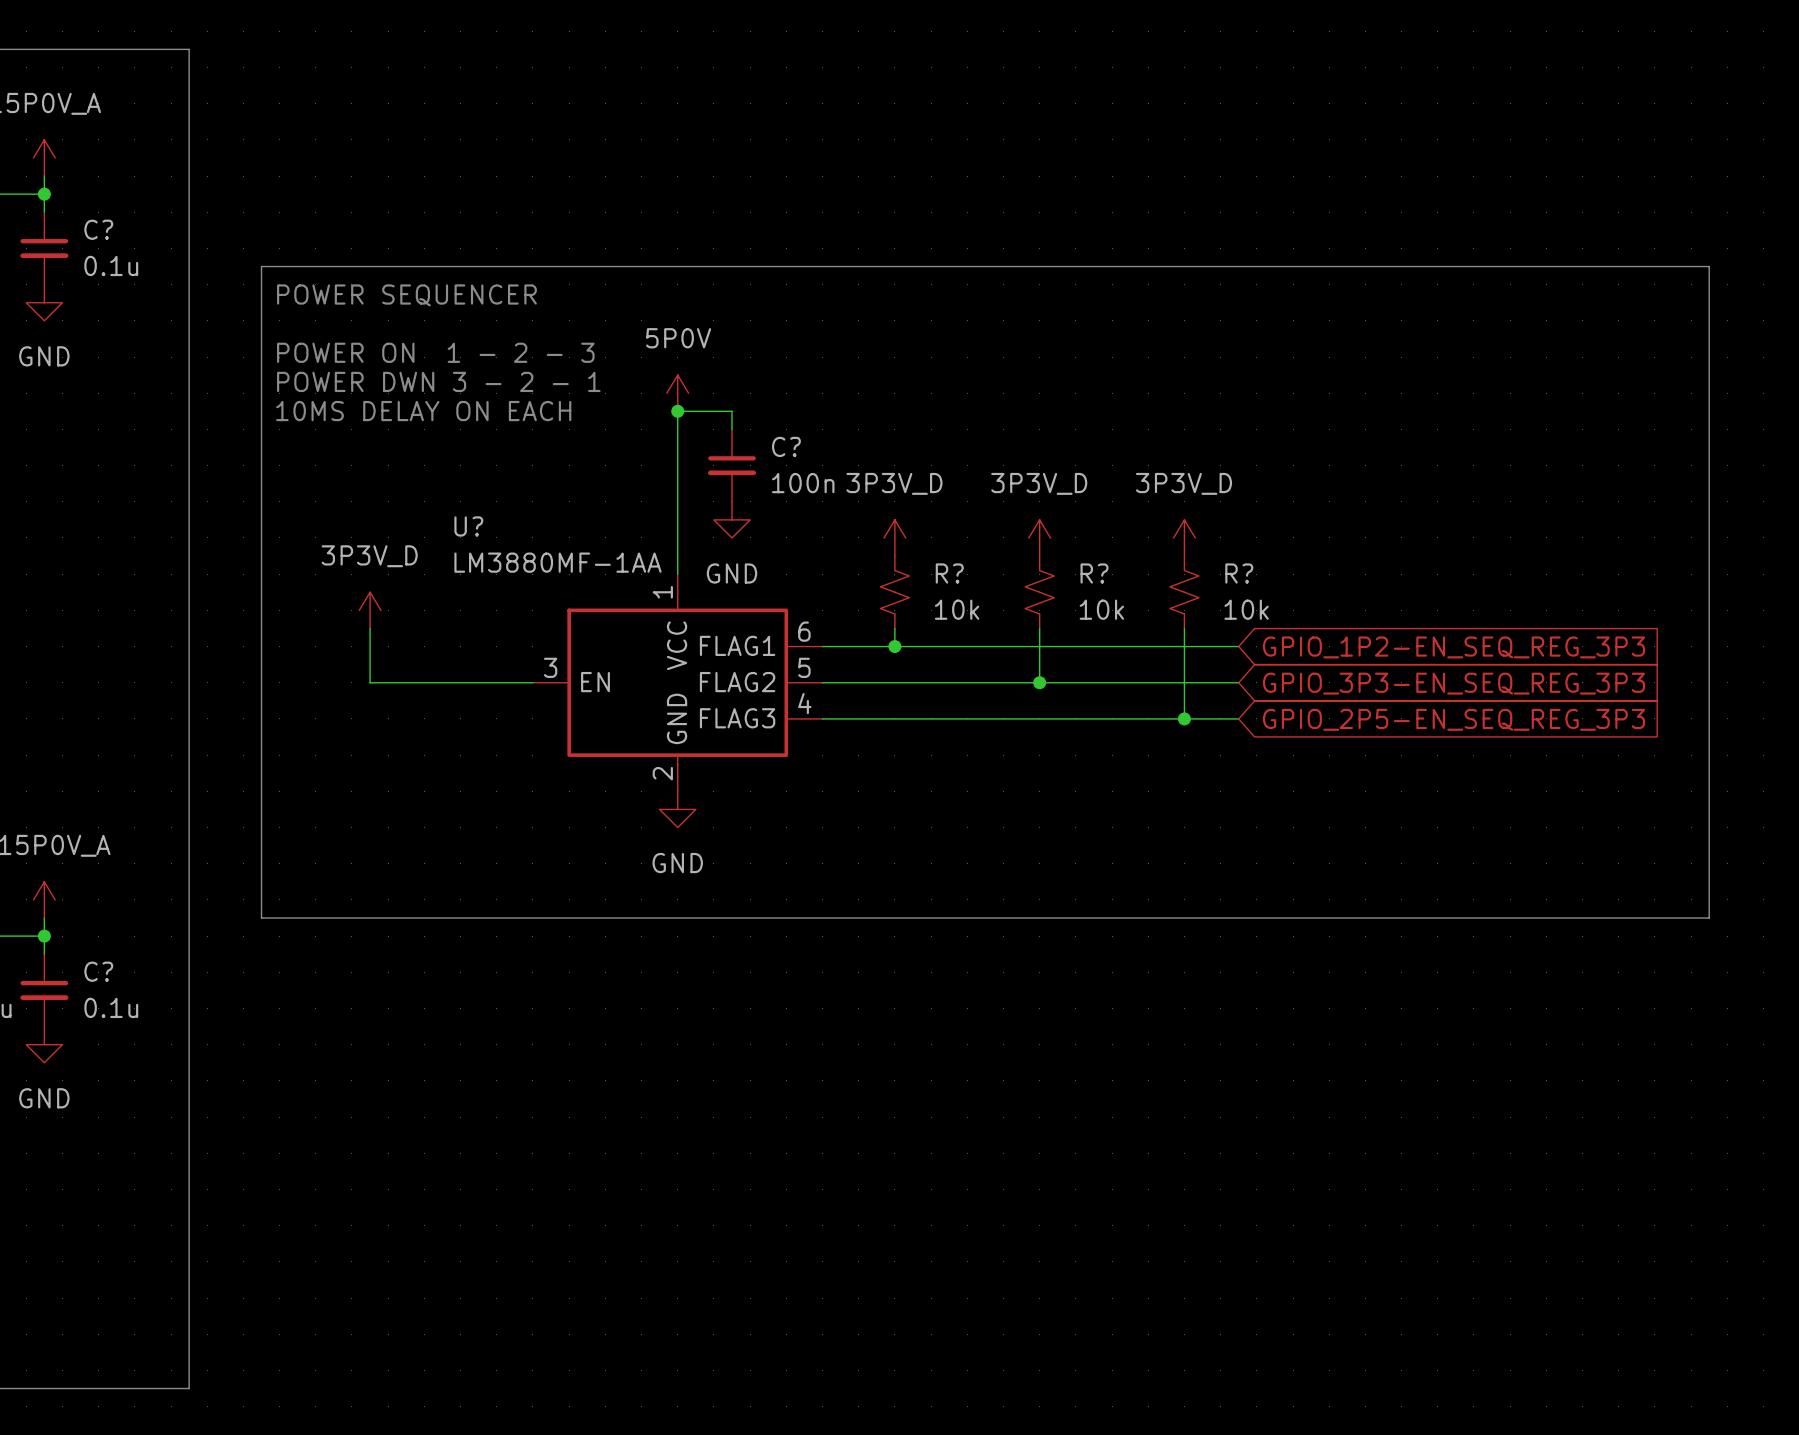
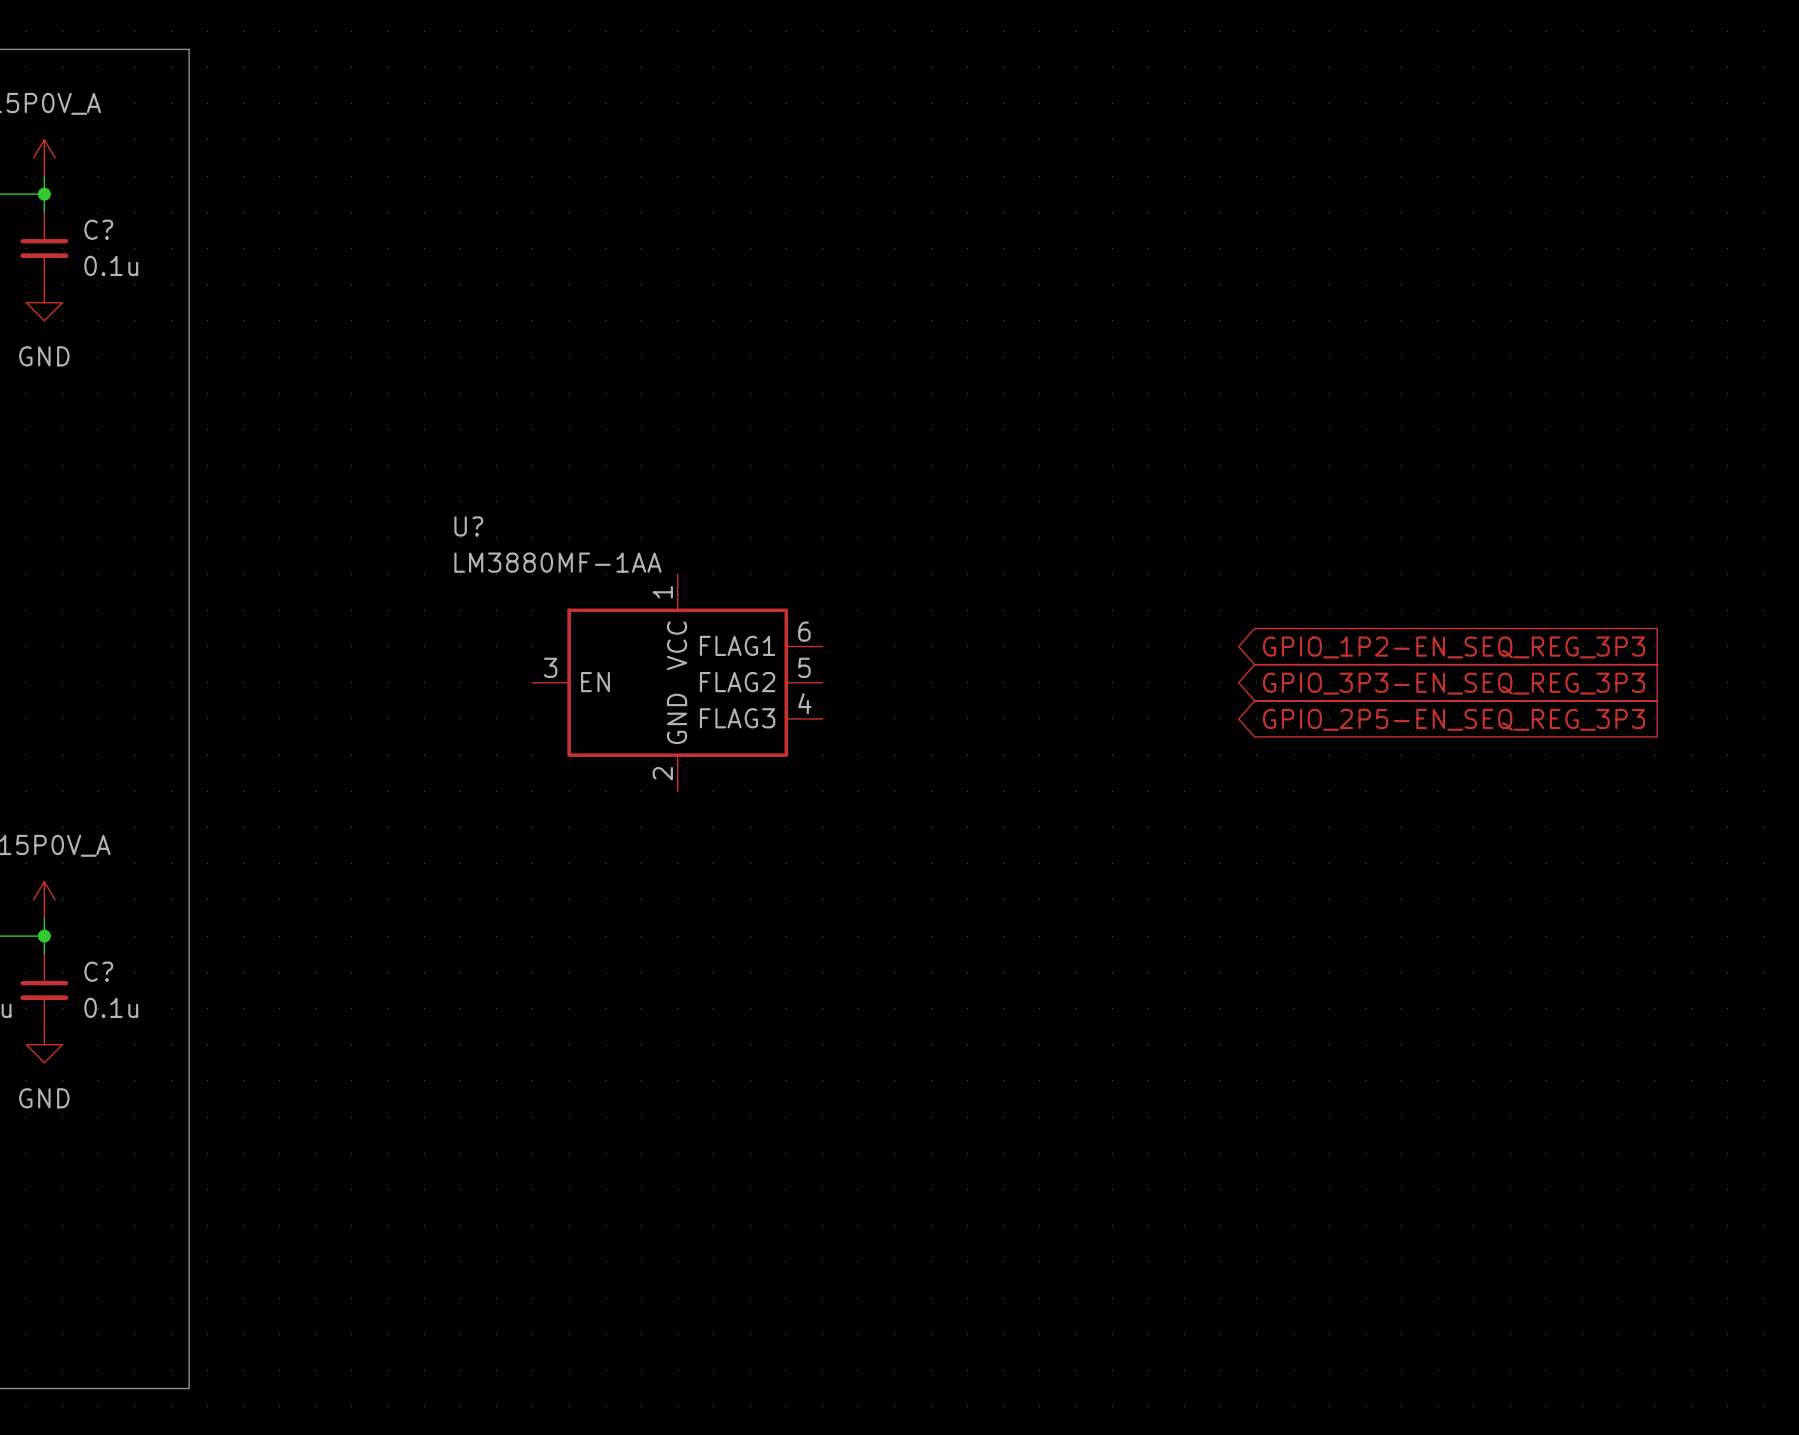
line: (261, 266) (1709, 266) (1709, 918) (261, 918) (261, 266) -> none
text: POWER SEQUENCER (406, 295) -> none
text: POWER ON 1 - 2 - 3 (435, 352) -> none
text: POWER DWN 3 - 2 - 1 (438, 381) -> none
power symbol: 5P0V (677, 393) -> none
text: 10MS DELAY ON EACH (423, 411) -> none
junction: (677, 411) -> none
wire: (732, 429) (732, 411) (677, 411) (677, 574) -> none
C?: 100n (732, 465) -> none
power symbol: GND (732, 519) -> none
power symbol: 3P3V_D (894, 537) -> none
power symbol: 3P3V_D (1039, 537) -> none
power symbol: 3P3V_D (1184, 537) -> none
R?: 10k (894, 592) -> none
R?: 10k (1039, 592) -> none
R?: 10k (1184, 592) -> none
power symbol: 3P3V_D (370, 610) -> none
wire: (370, 628) (370, 682) (532, 682) -> none
wire: (894, 628) (894, 646) -> none
wire: (1039, 628) (1039, 682) -> none
wire: (1184, 628) (1184, 718) -> none
wire: (822, 646) (1238, 646) -> none
junction: (894, 646) -> none
wire: (822, 682) (1238, 682) -> none
junction: (1039, 682) -> none
wire: (822, 718) (1238, 718) -> none
junction: (1184, 718) -> none
power symbol: GND (677, 809) -> none

